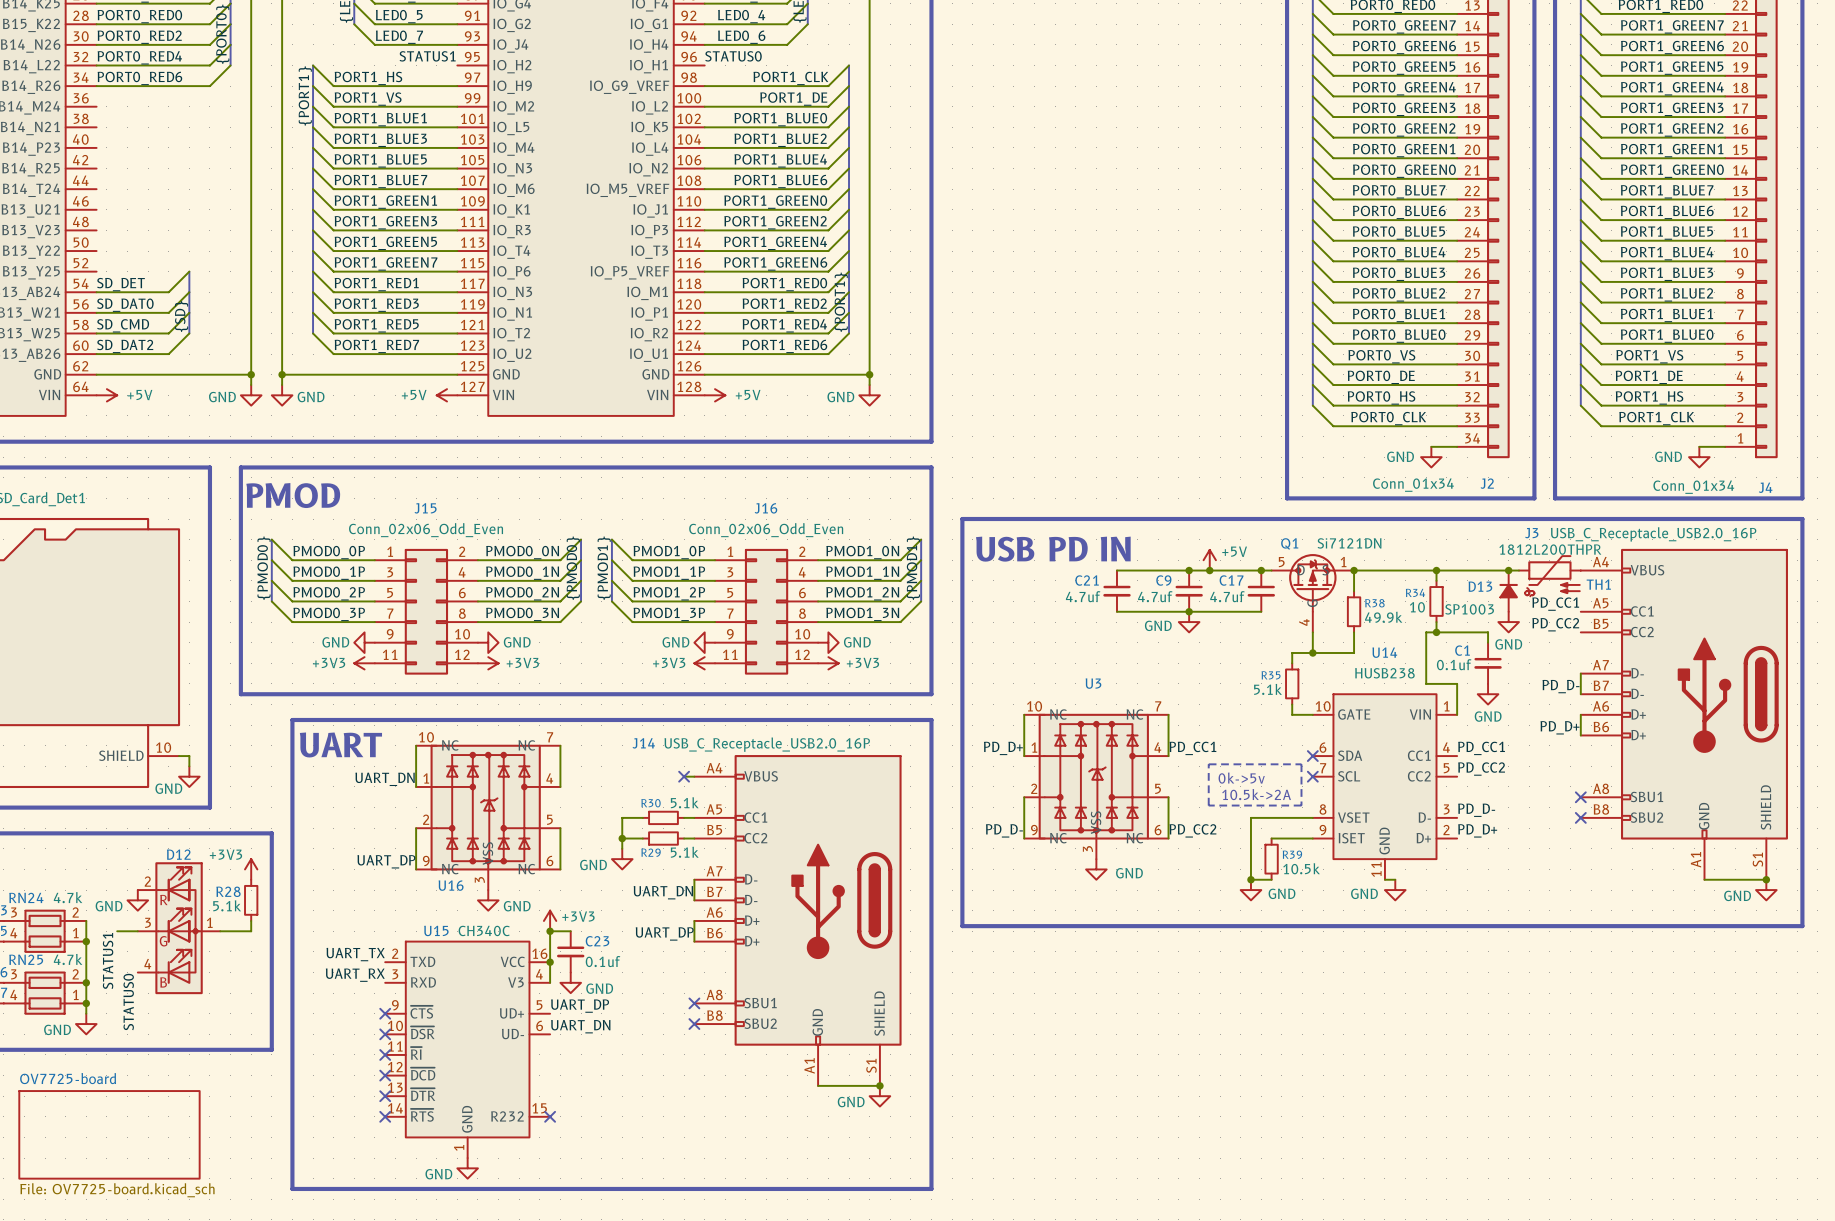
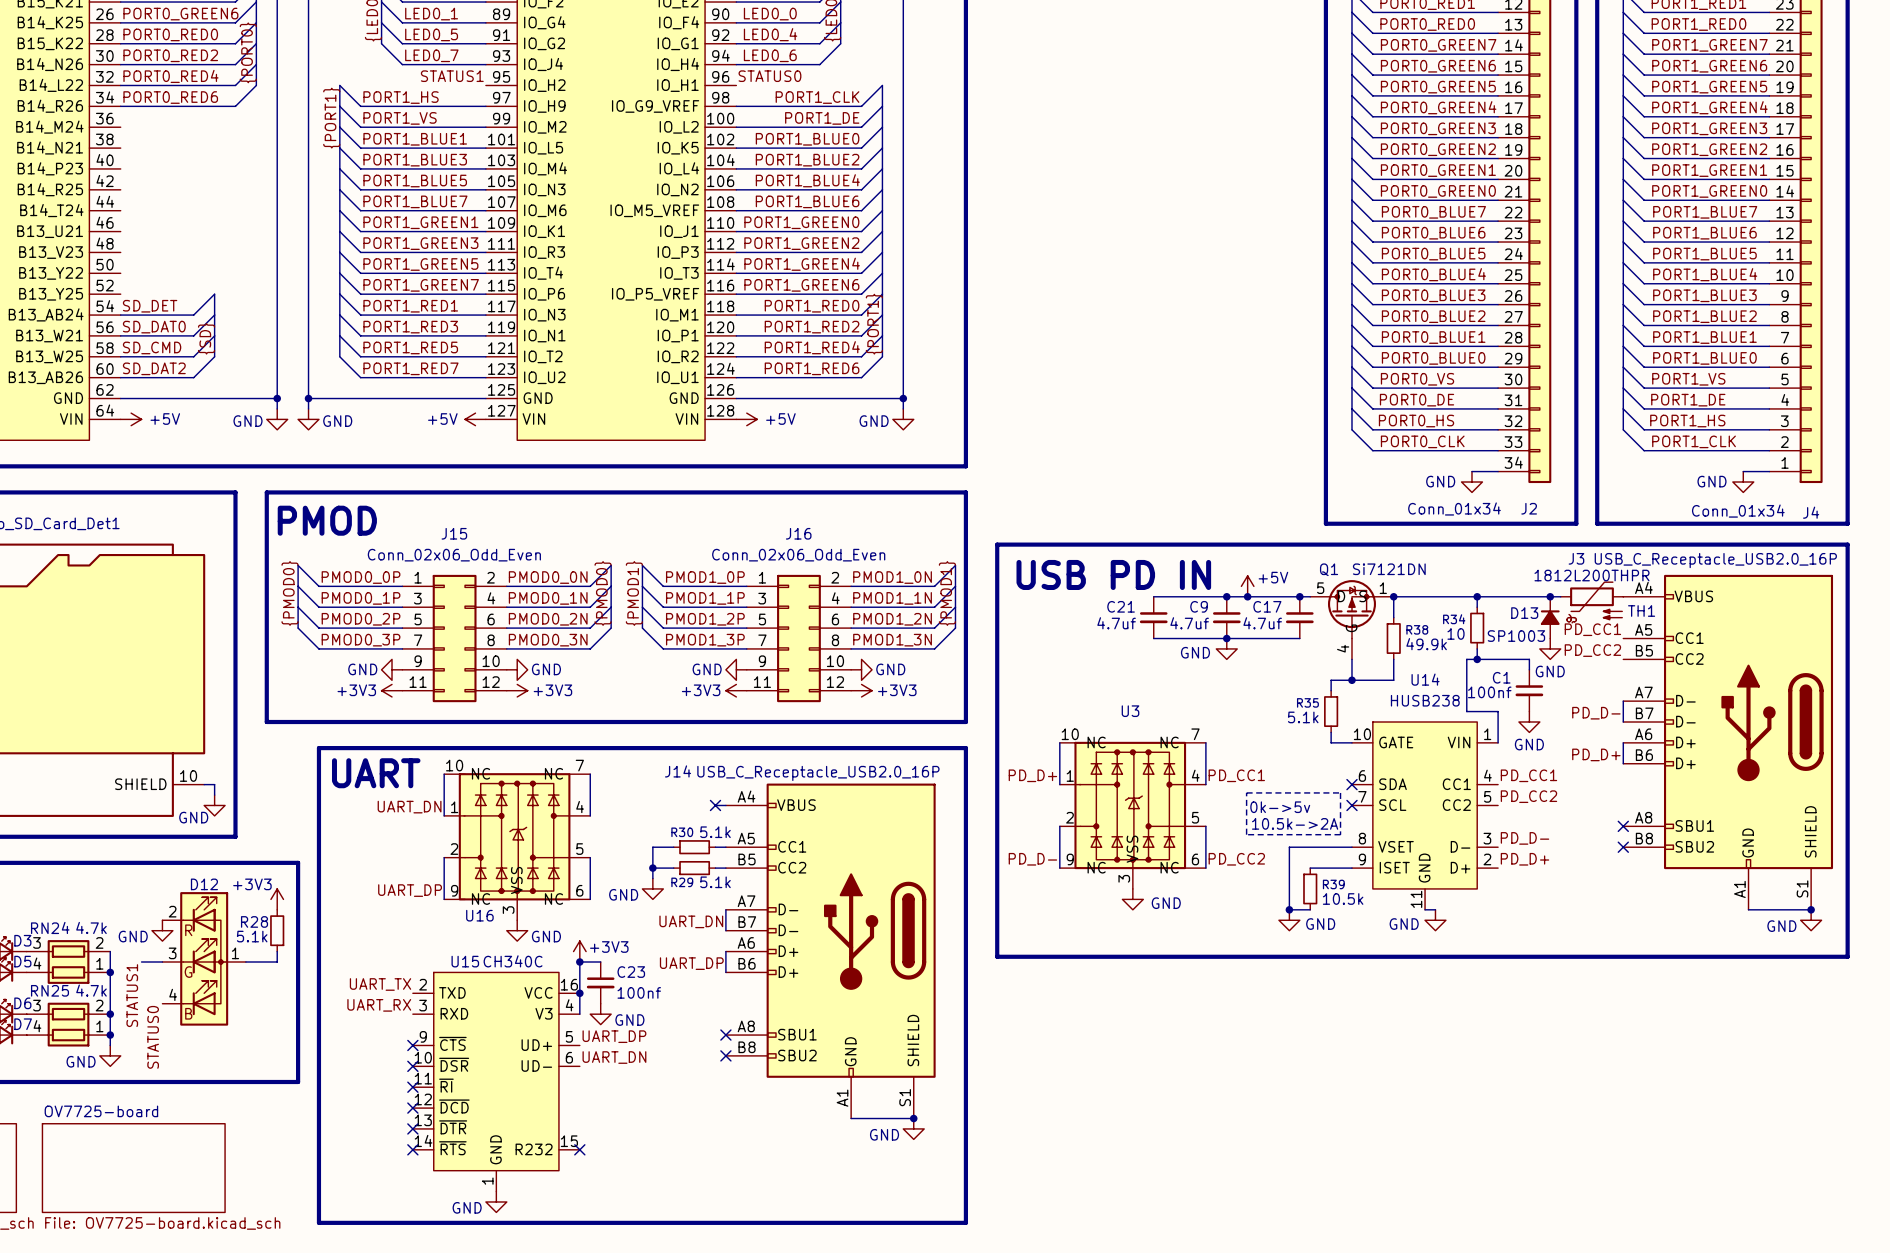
C1 value: 0.1uf (1454, 664) -> 100nf (1489, 692)
C23 value: 0.1uf (603, 961) -> 100nf (639, 992)

